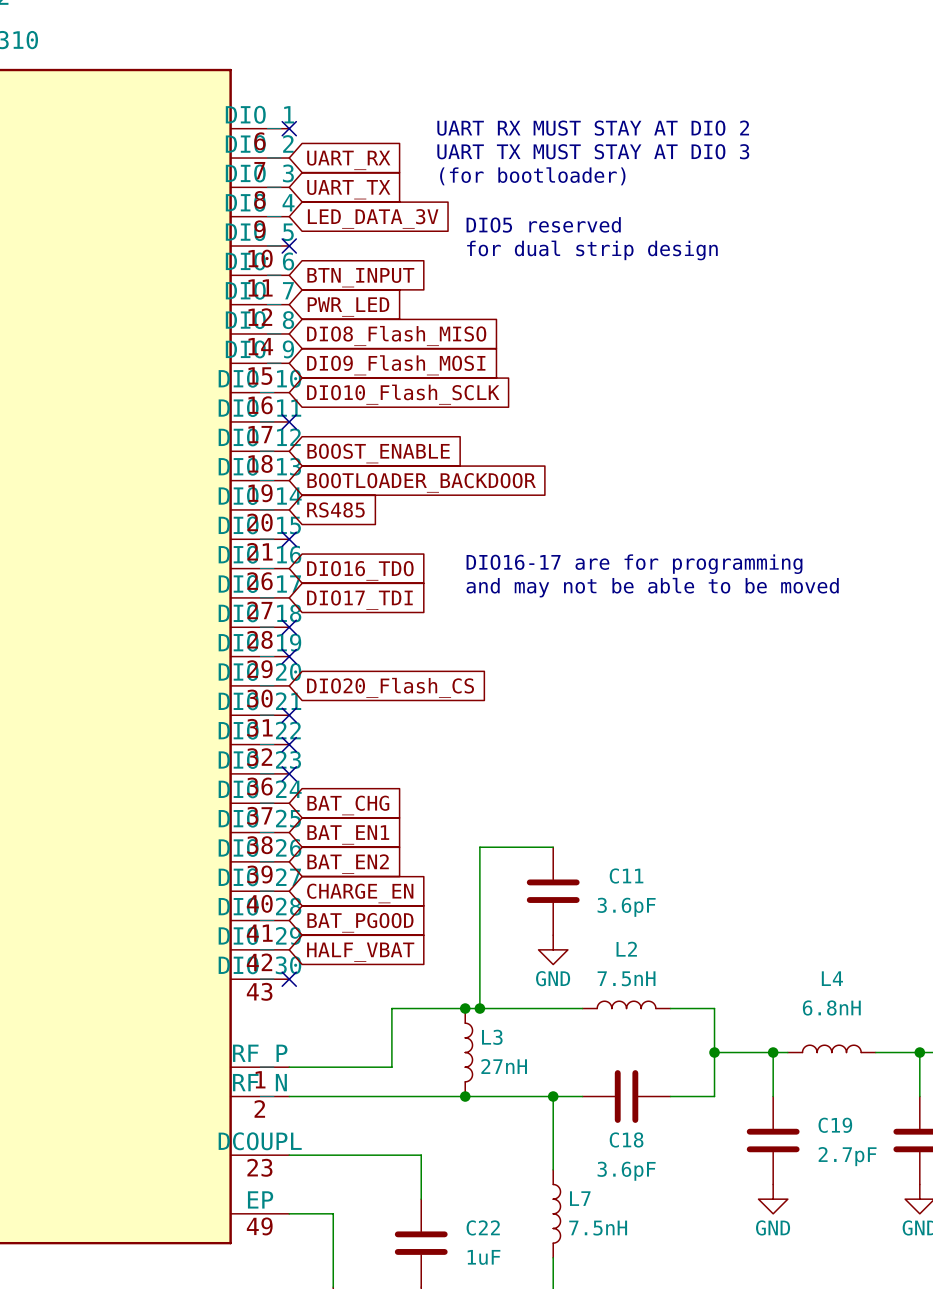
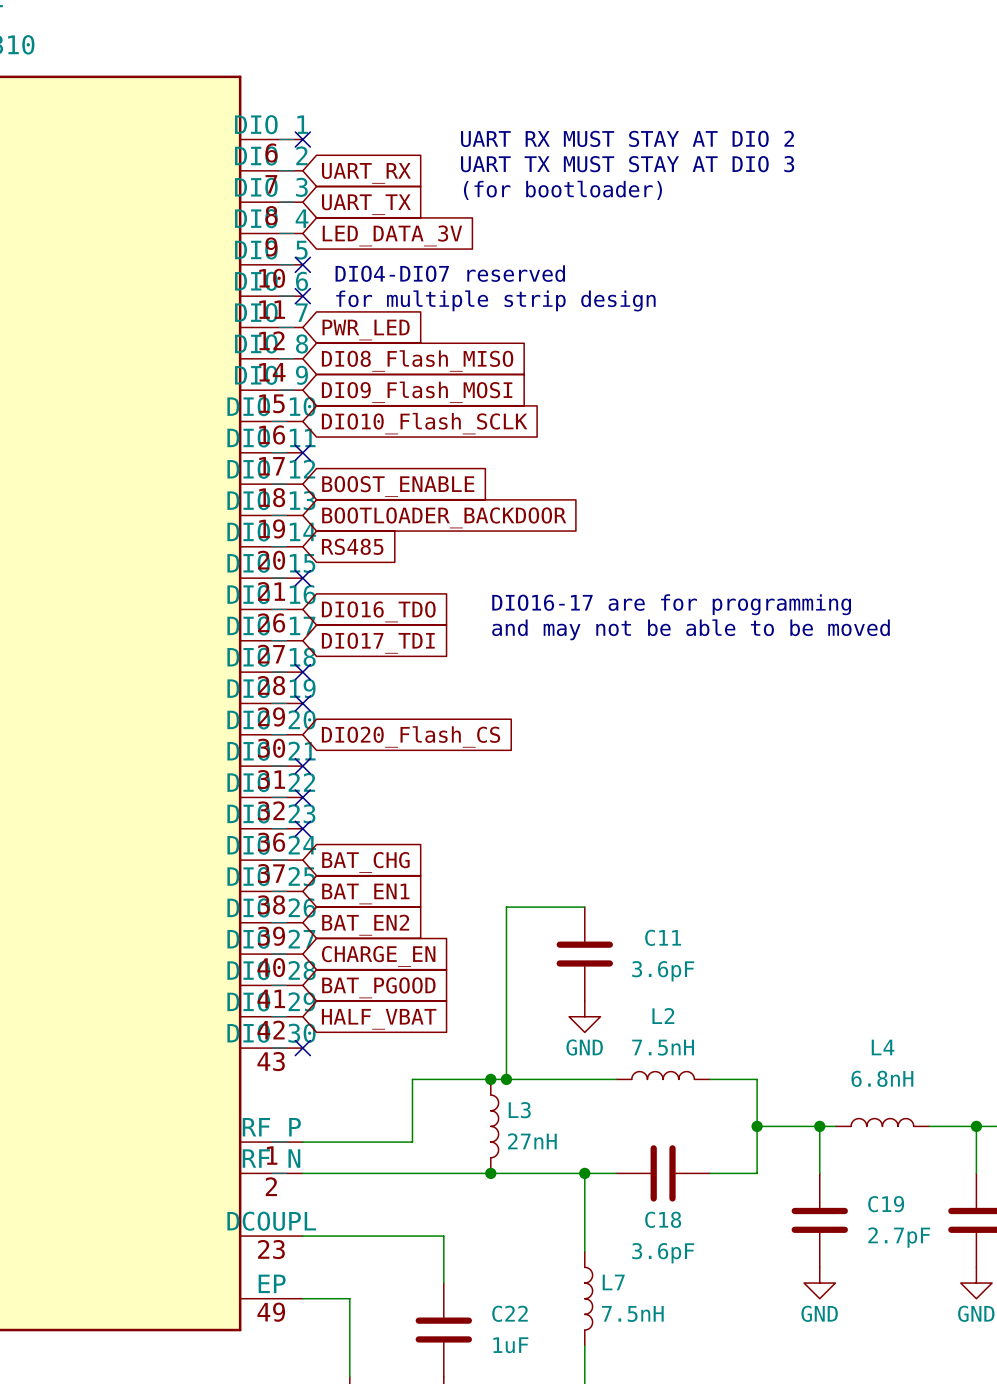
text: DIO5 reserved (543, 224) -> DIO4-DIO7 reserved (450, 273)
text: for dual strip design (592, 250) -> for multiple strip design (495, 300)
no-connect mark: none -> (302, 296)
global label: BTN_INPUT (360, 277) -> none

